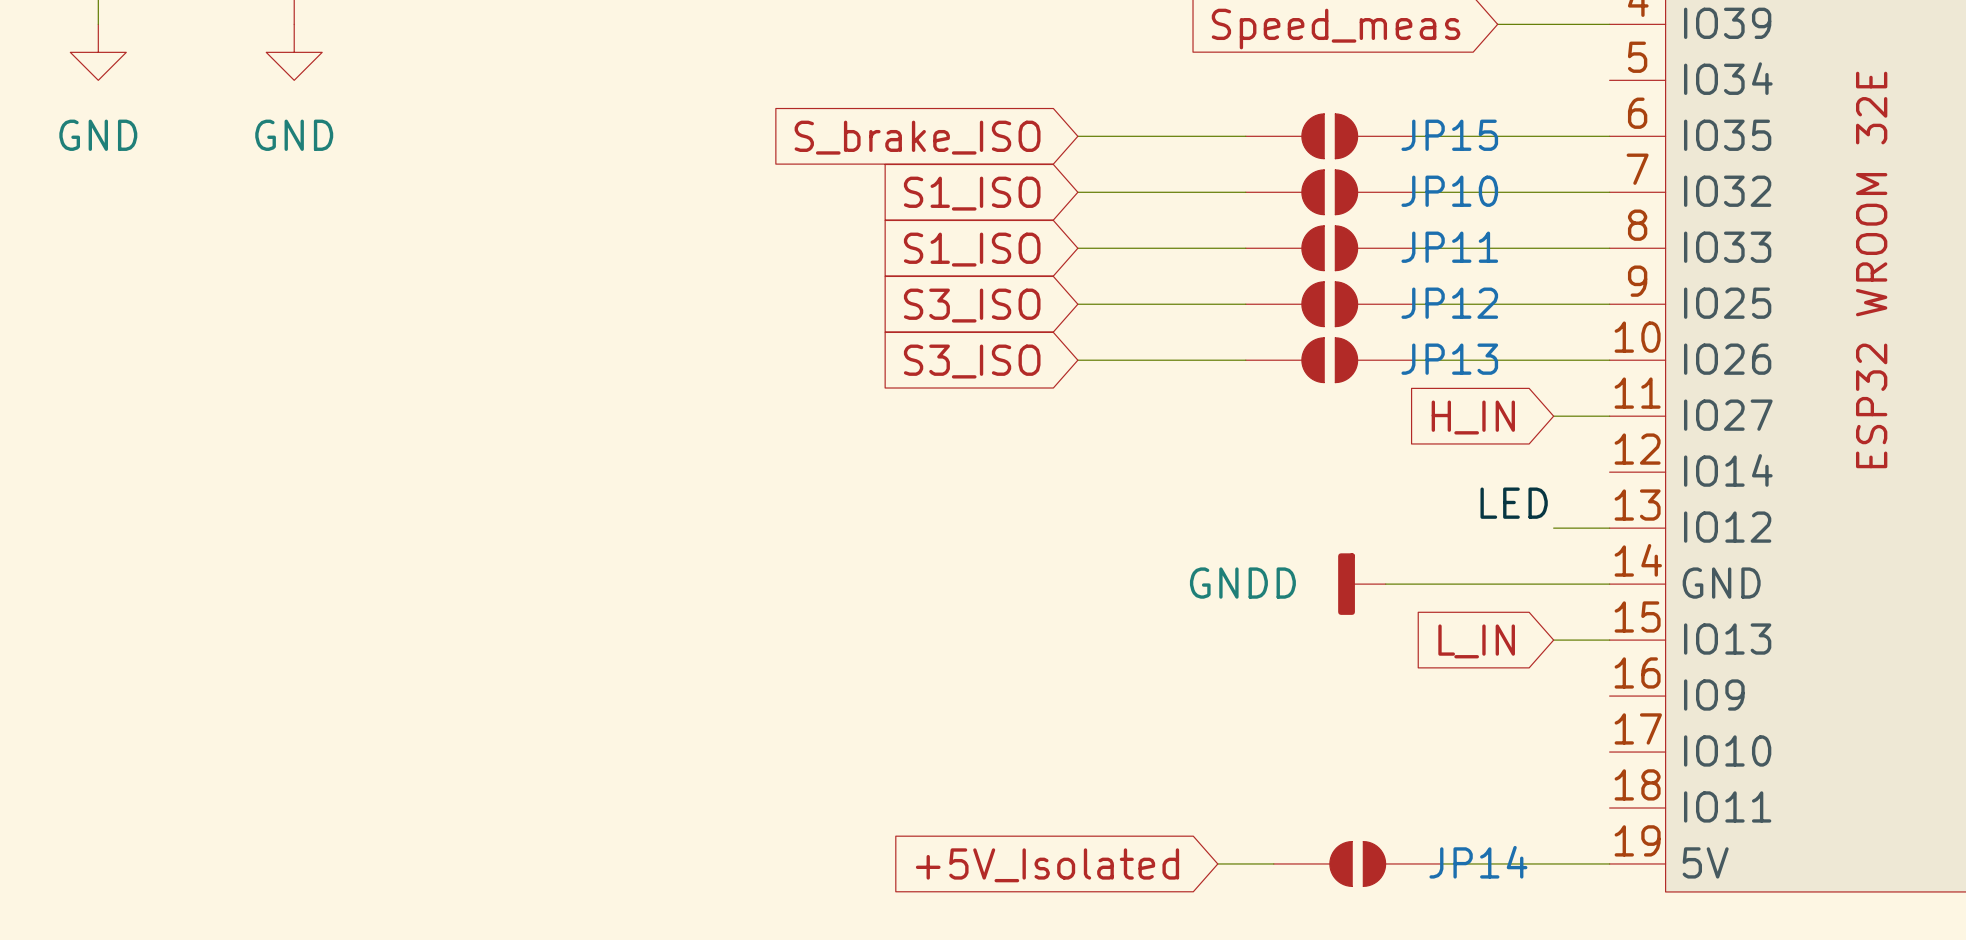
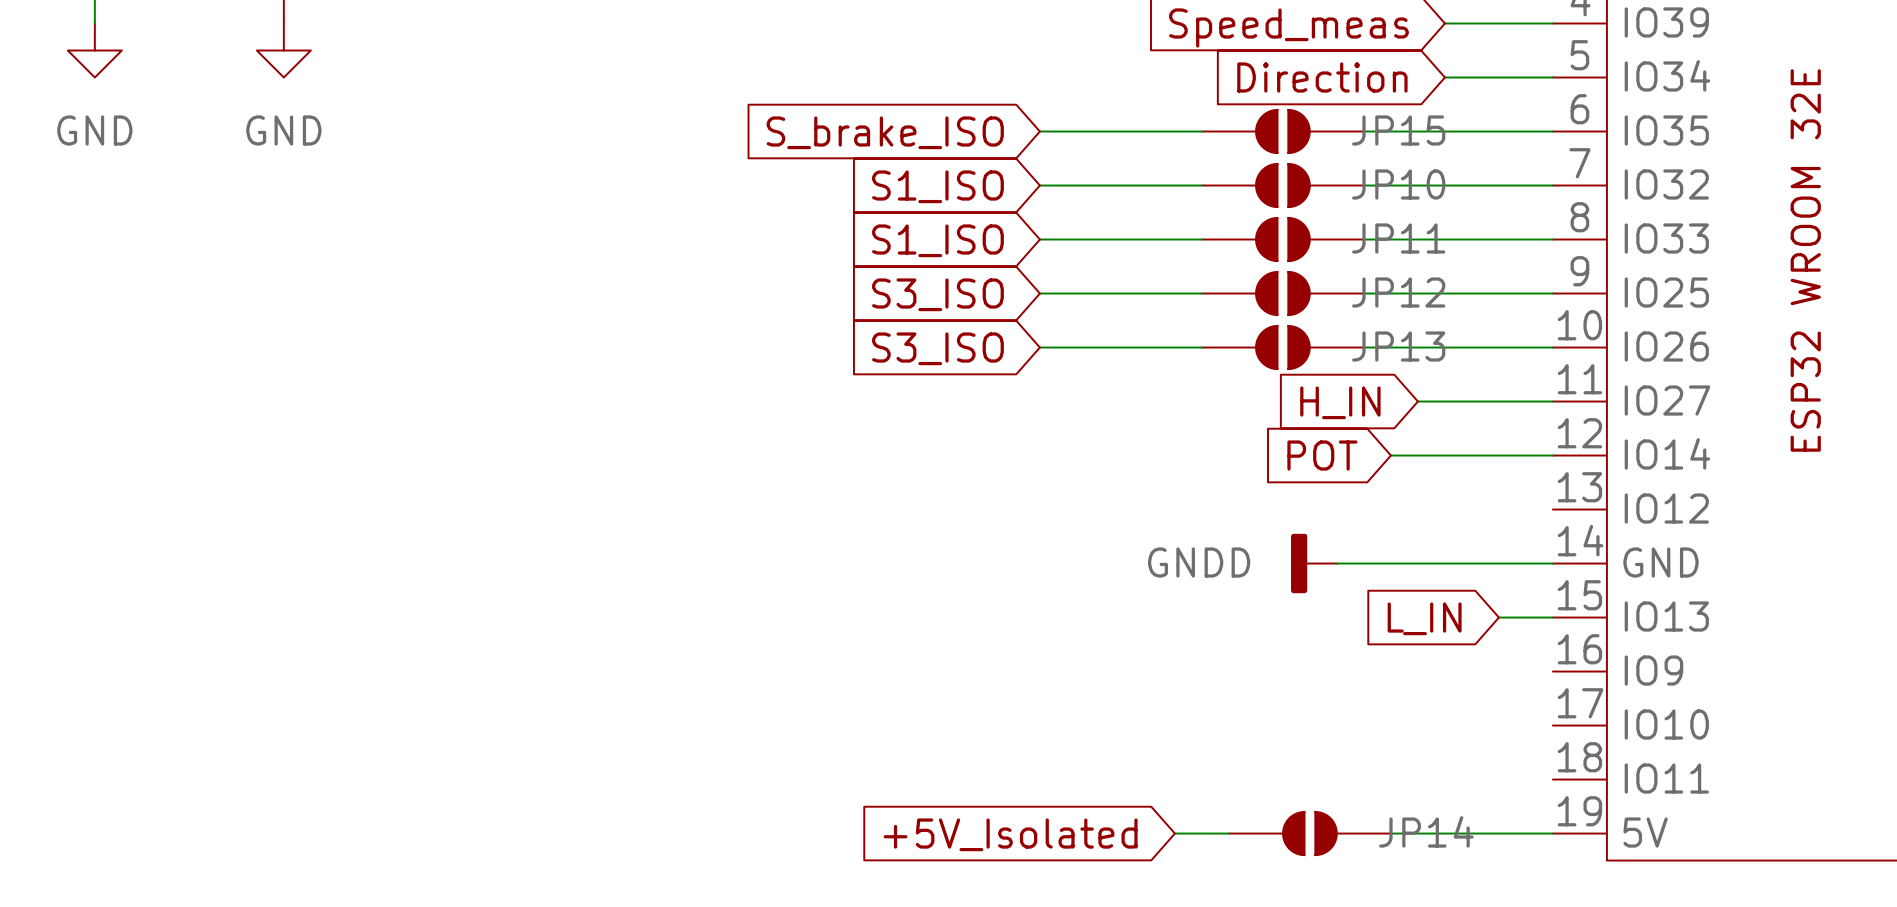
global label: none -> Direction (1322, 77)
wire: none -> (1444, 77) (1552, 77)
wire: none -> (1417, 401) (1498, 401)
global label position: H_IN (1473, 417) -> H_IN (1340, 402)
global label: none -> POT (1322, 455)
wire: none -> (1390, 455) (1552, 455)
label: LED (1514, 503) -> none
wire: (1553, 528) (1609, 528) -> none

